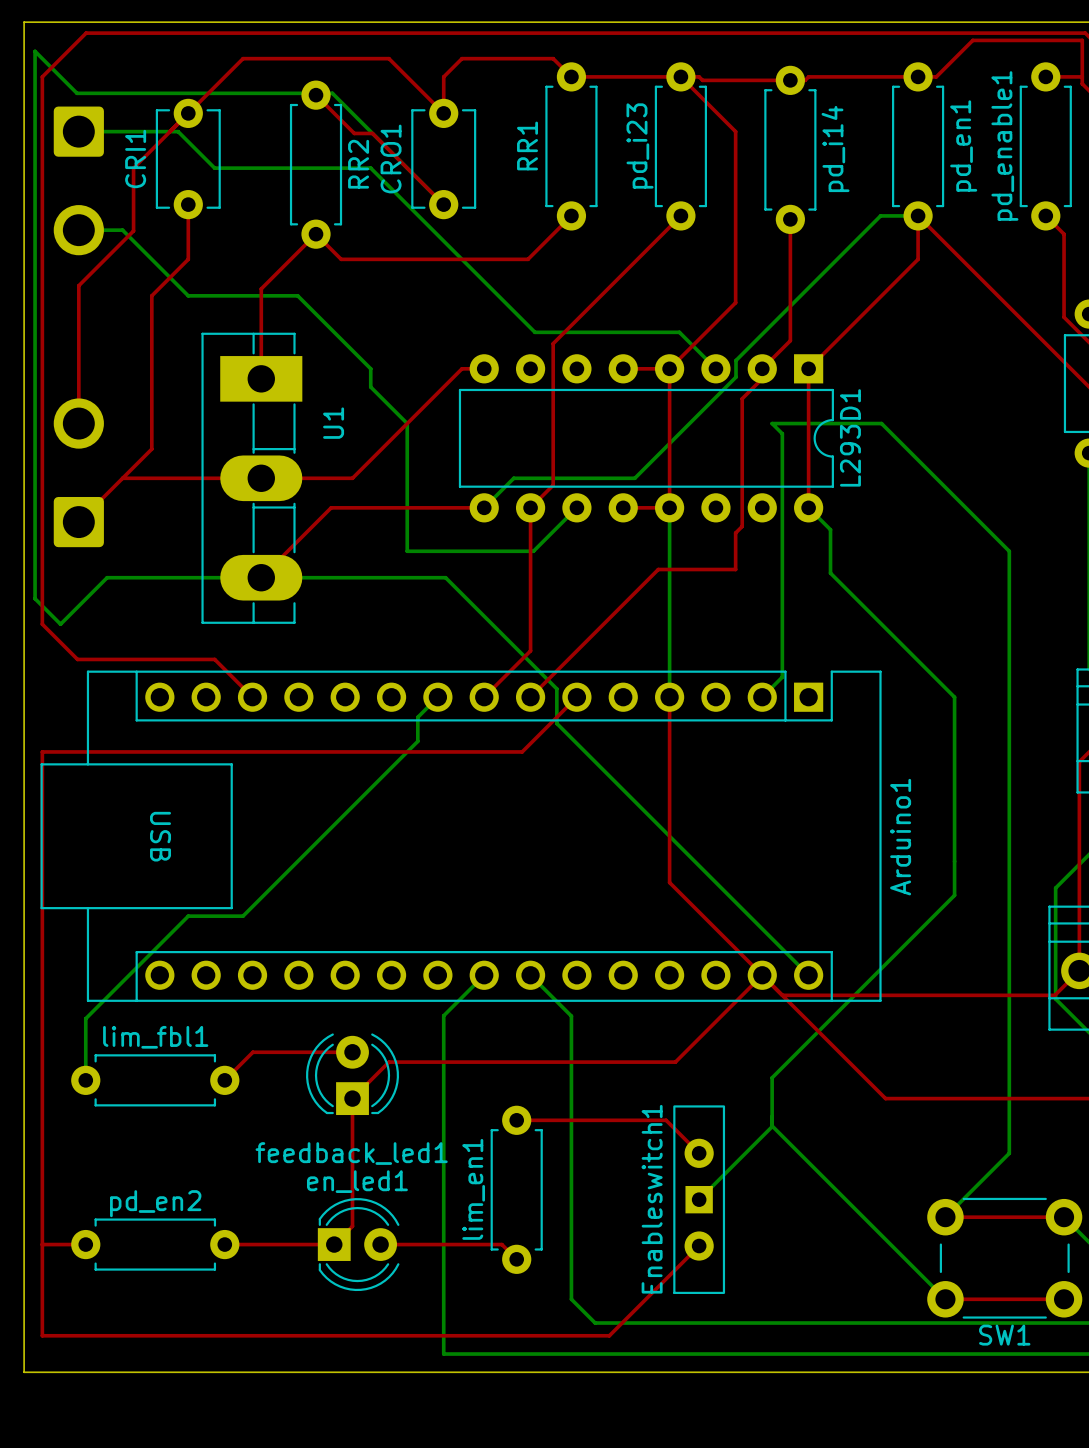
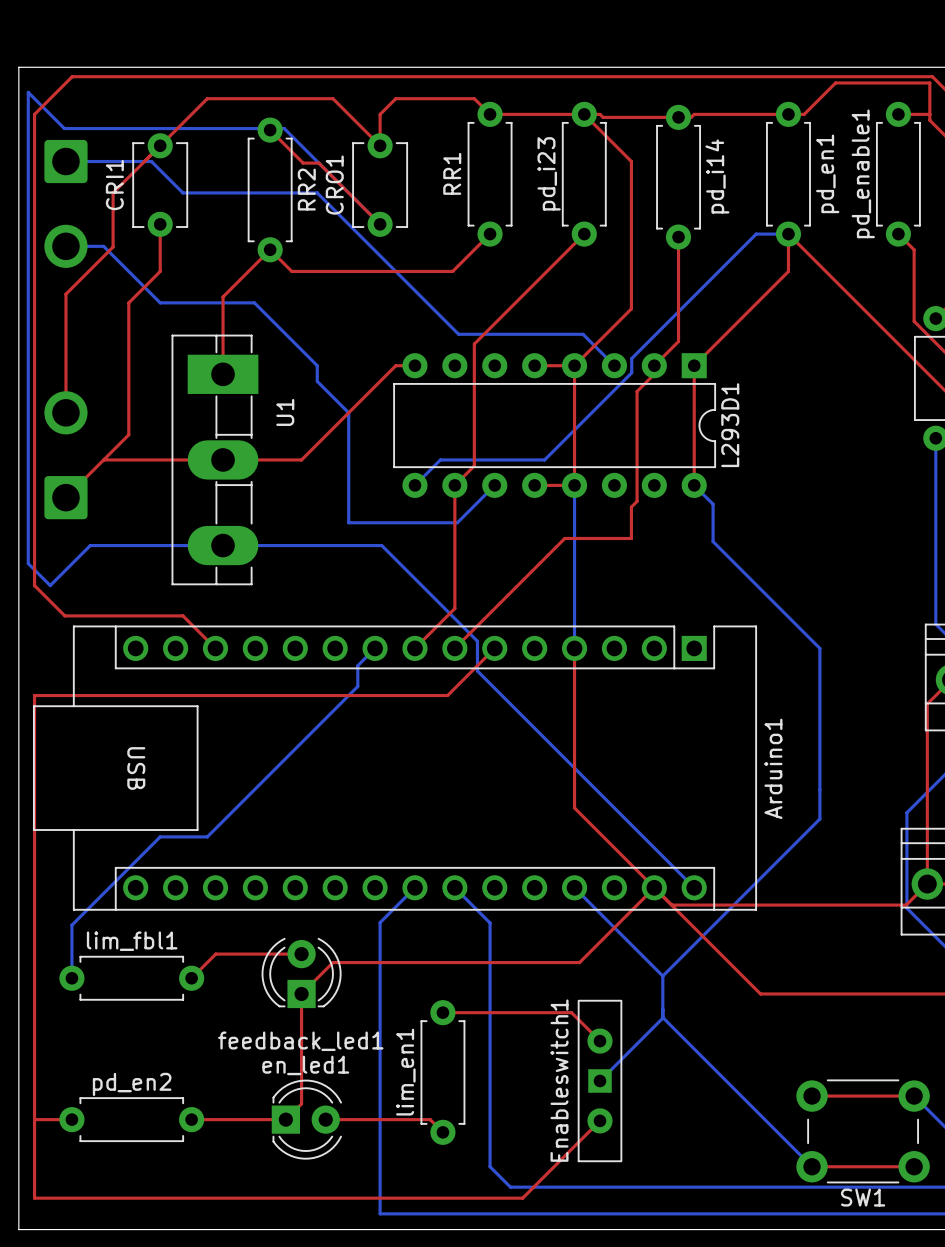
top track: (484, 507) (331, 507) (261, 577) -> none
bottom track: (762, 697) (782, 677) (782, 433) (772, 423) (881, 423) (1009, 551) (1009, 1153) (945, 1217) -> none
bottom track: none -> (574, 887) (662, 976)

